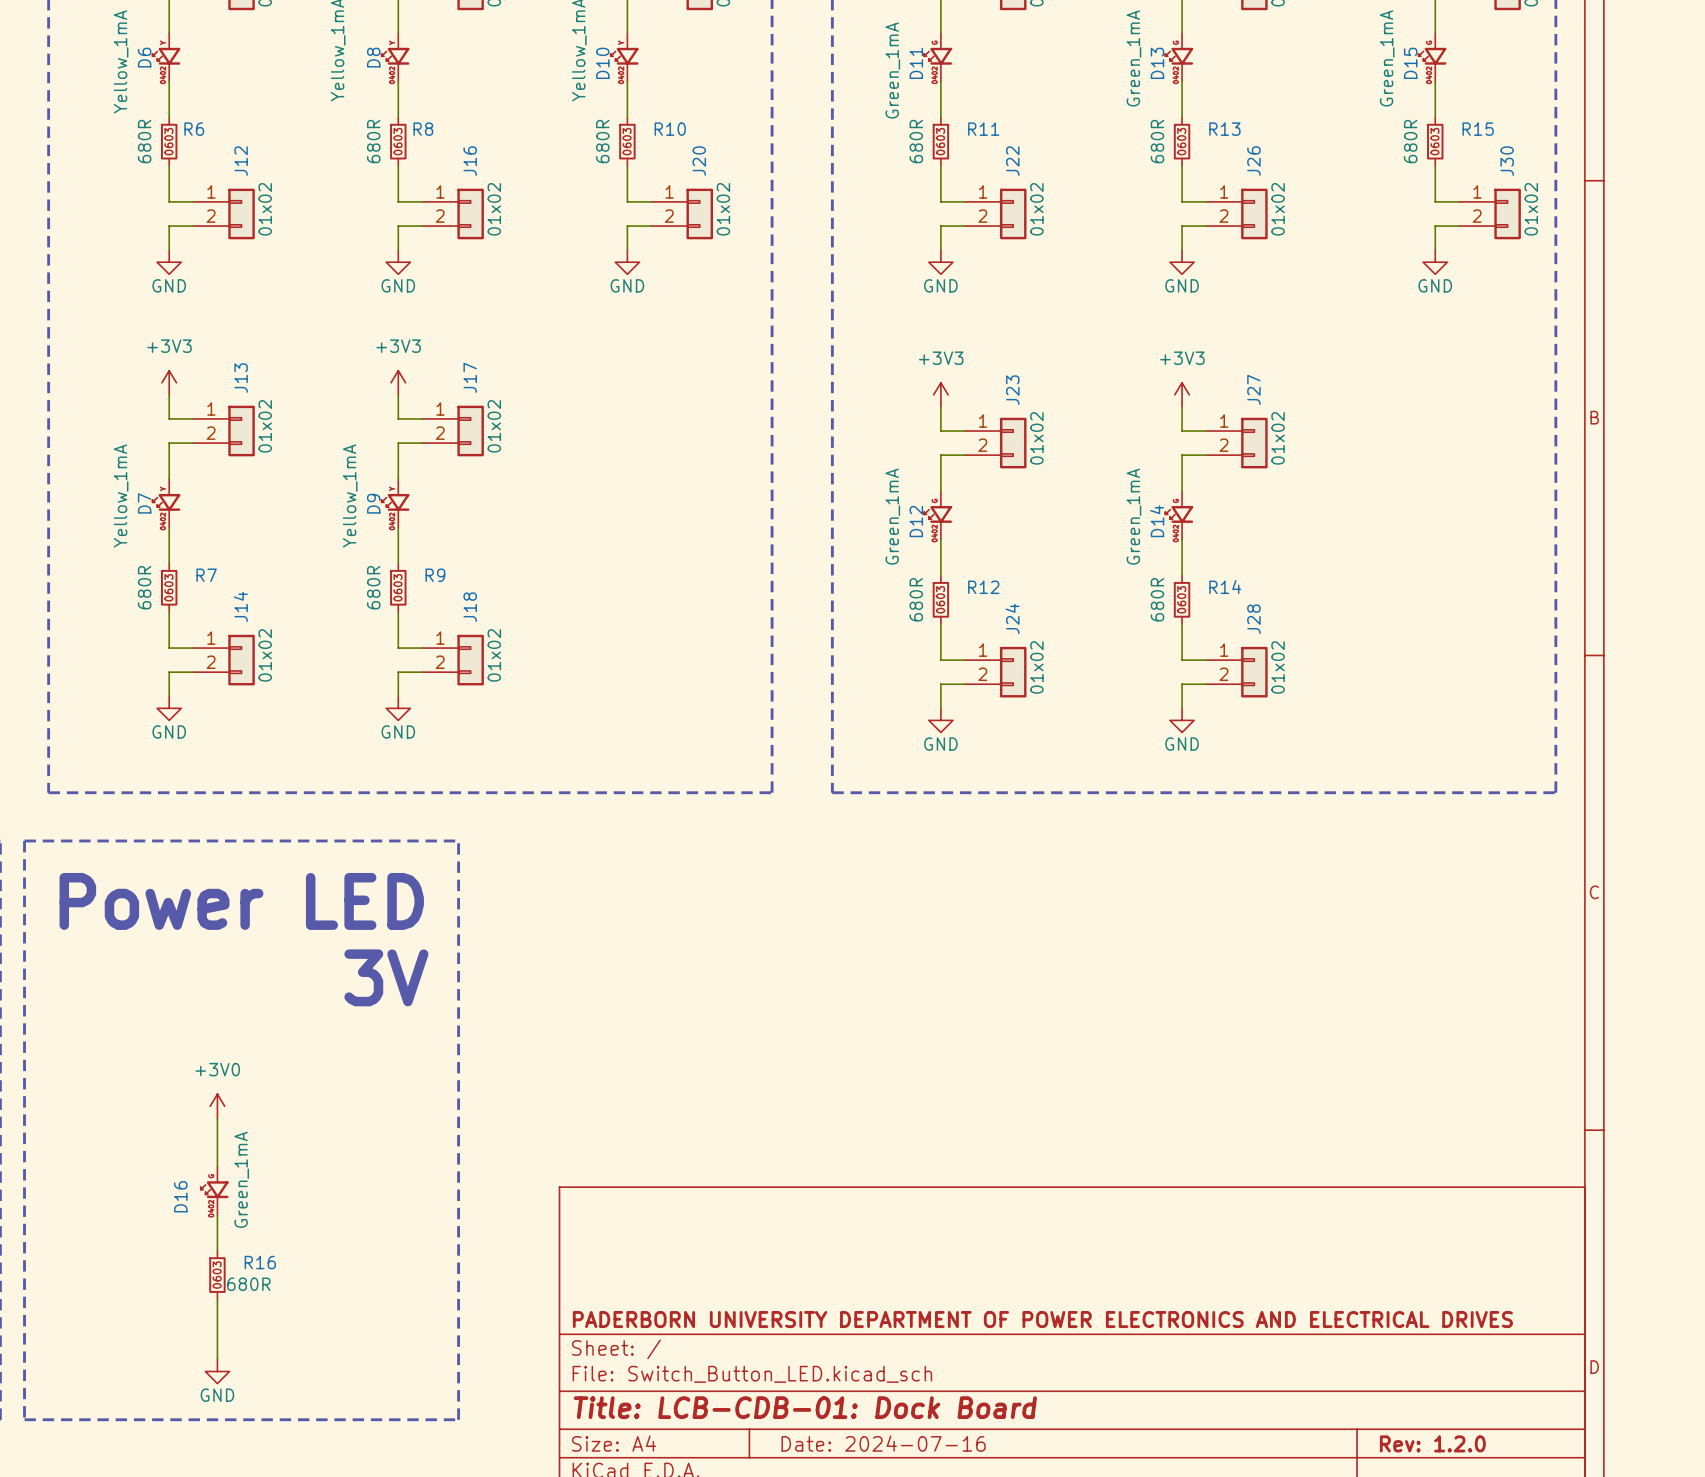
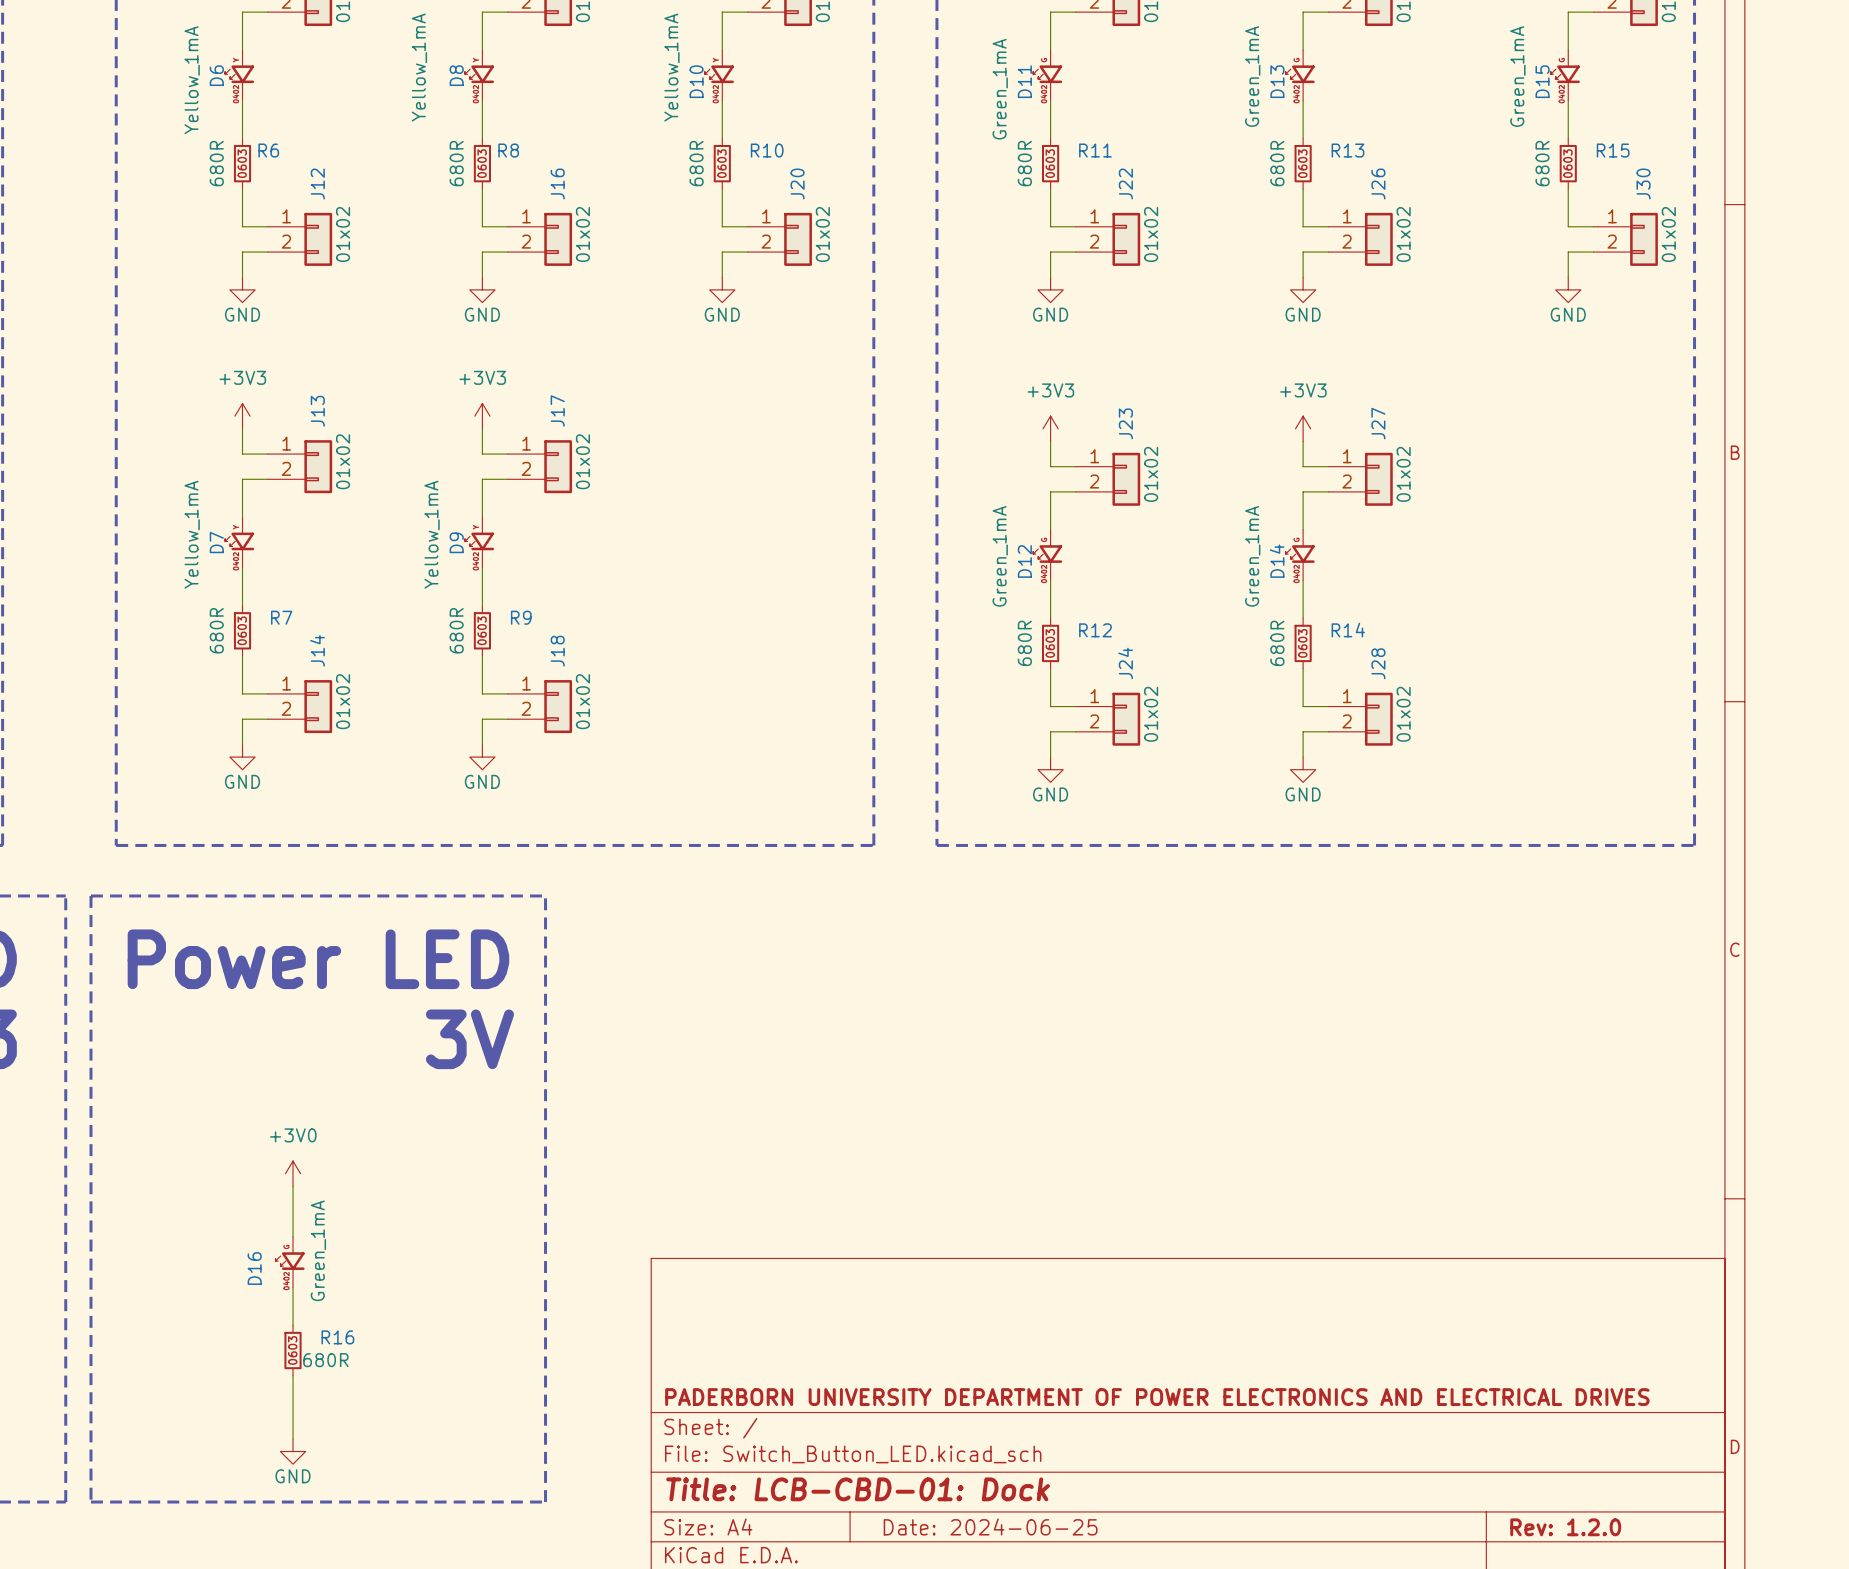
title block: Title: LCB-CDB-01: Dock Board (805, 1407) -> Title: LCB-CBD-01: Dock (858, 1489)
title block: Date: 2024-07-16 (883, 1443) -> Date: 2024-06-25 (990, 1526)

